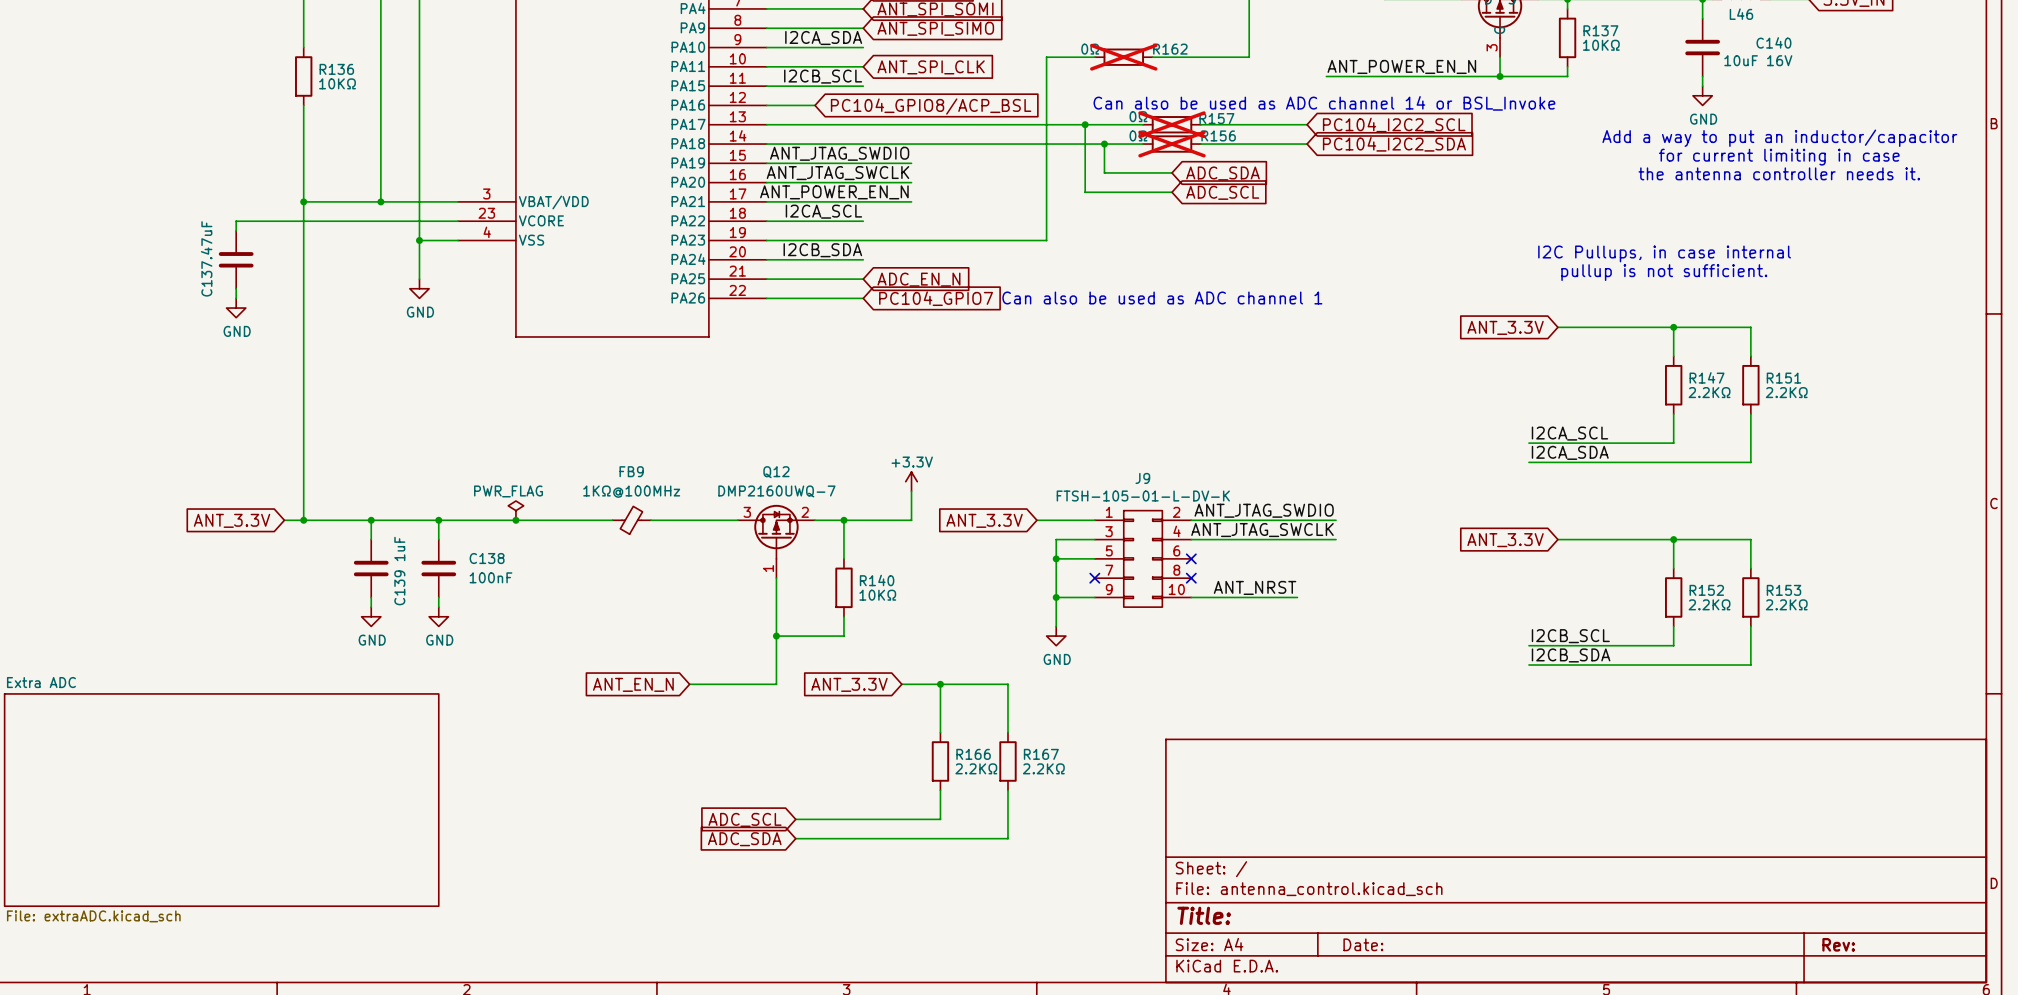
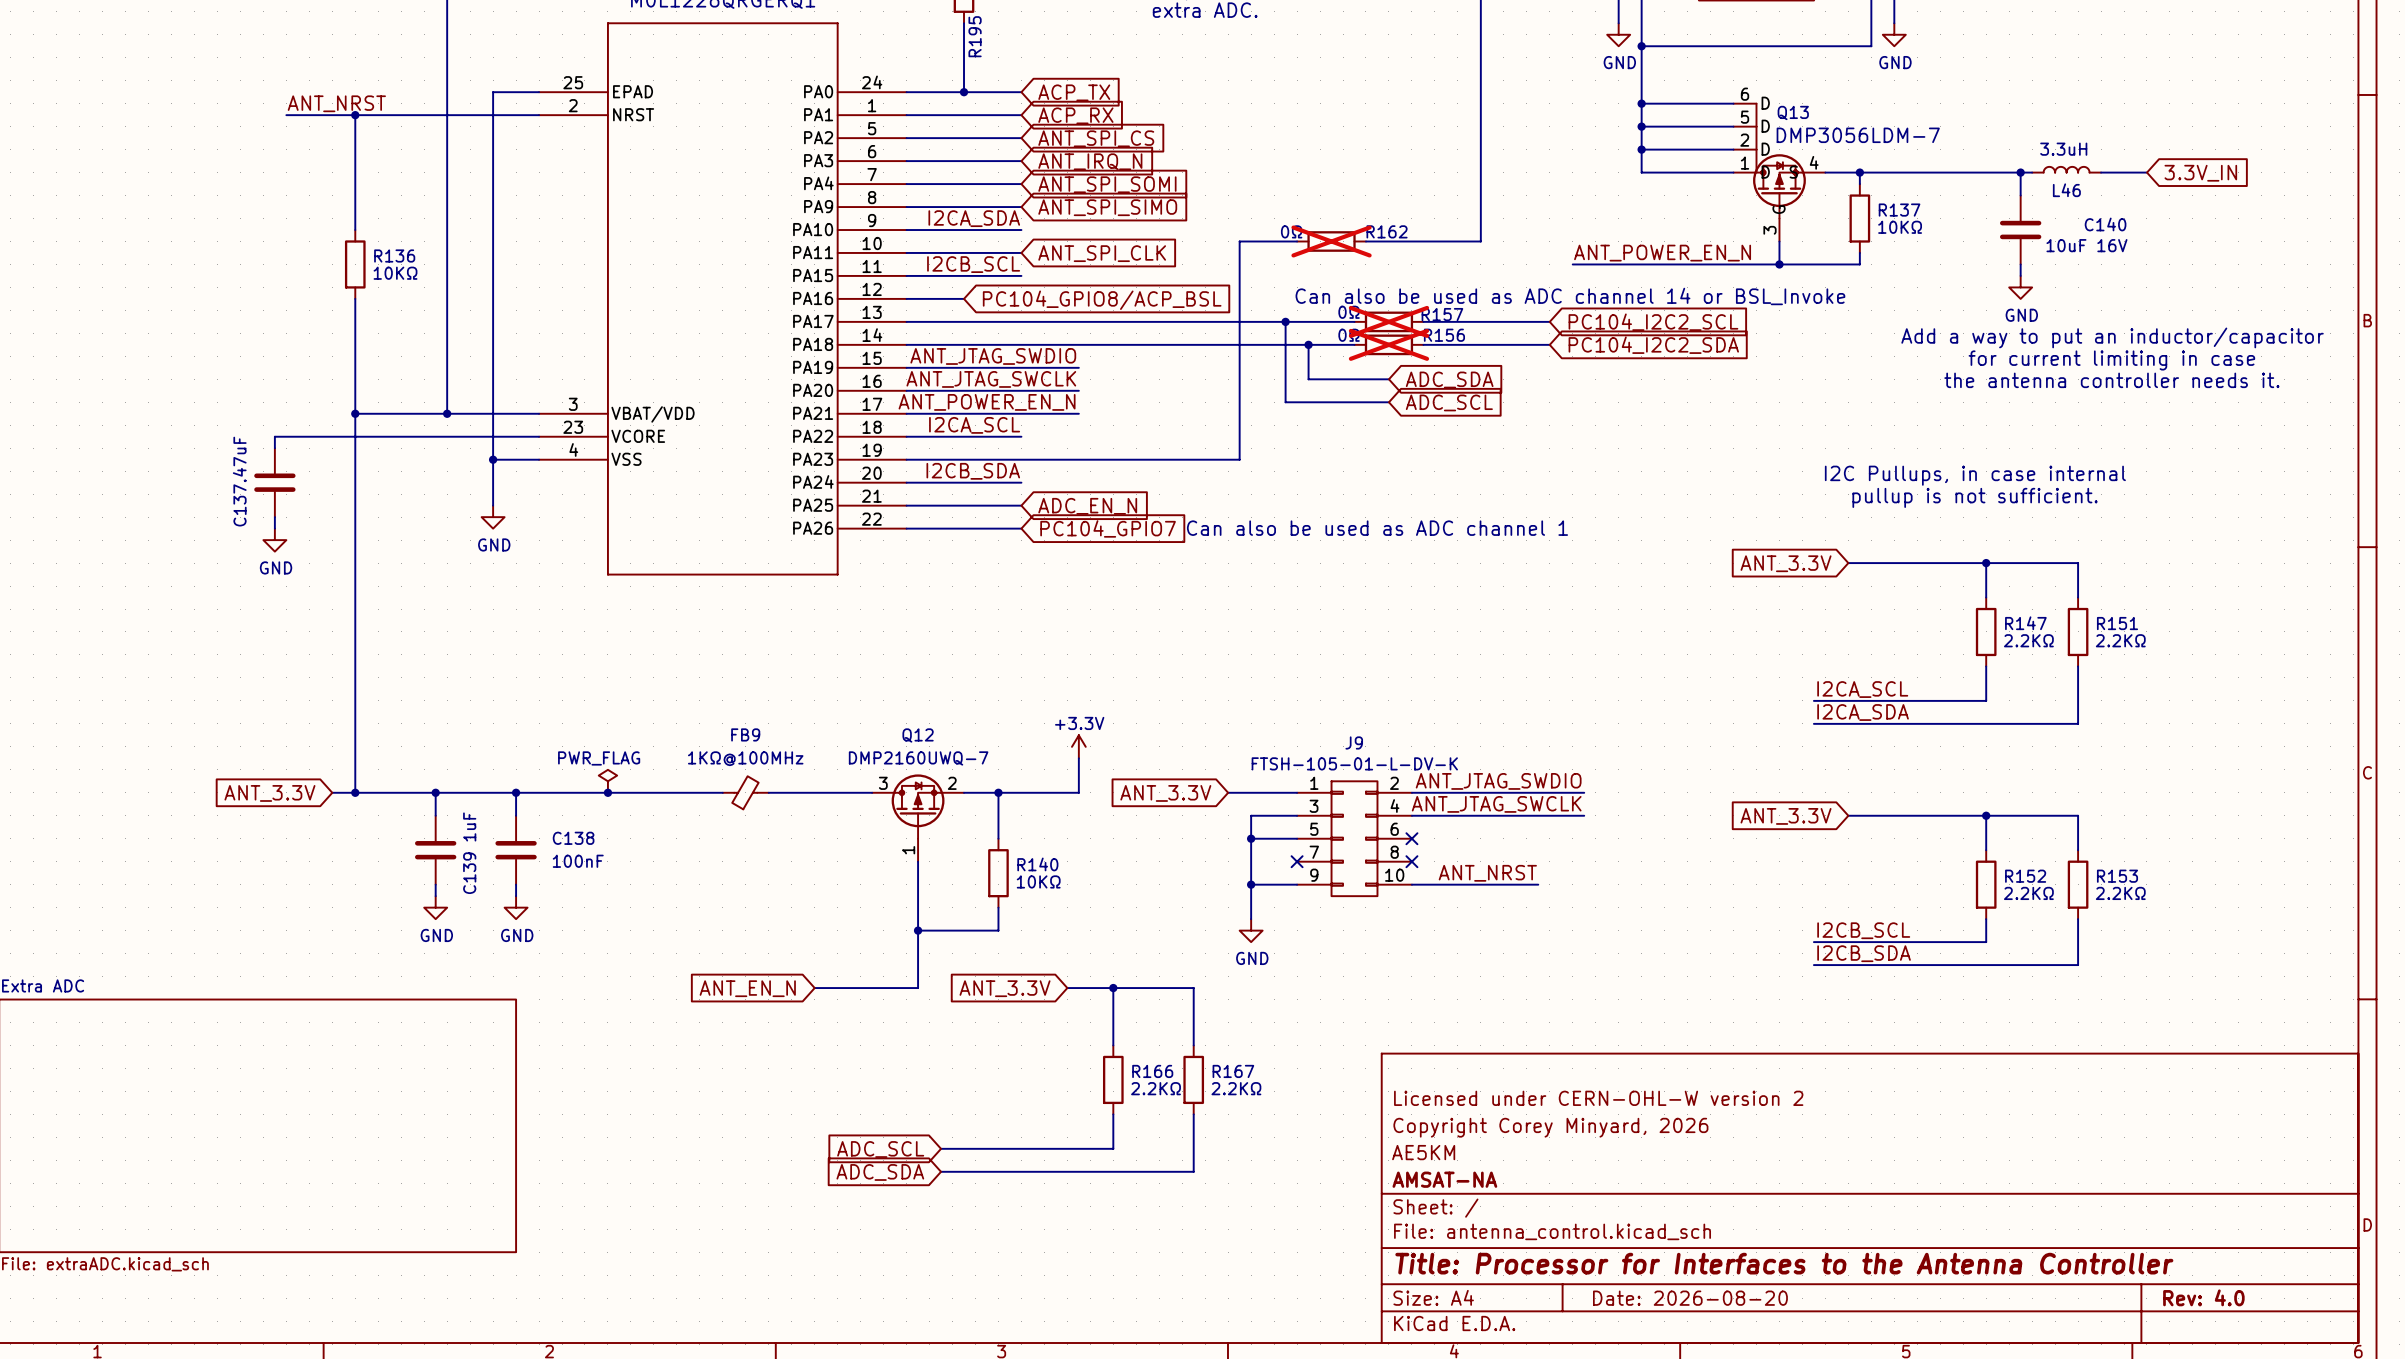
title block: none -> Licensed under CERN-OHL-W version 2 (1598, 1098)
title block: none -> Copyright Corey Minyard, 2026 (1550, 1127)
title block: none -> AE5KM (1423, 1152)
title block: none -> AMSAT-NA (1444, 1179)
title block: Title: (1204, 915) -> Title: Processor for Interfaces to the Antenna Controller (1784, 1263)
title block: Date: (1363, 944) -> Date: 2026-08-20 (1690, 1298)
title block: Rev: (1838, 944) -> Rev: 4.0 (2203, 1297)

